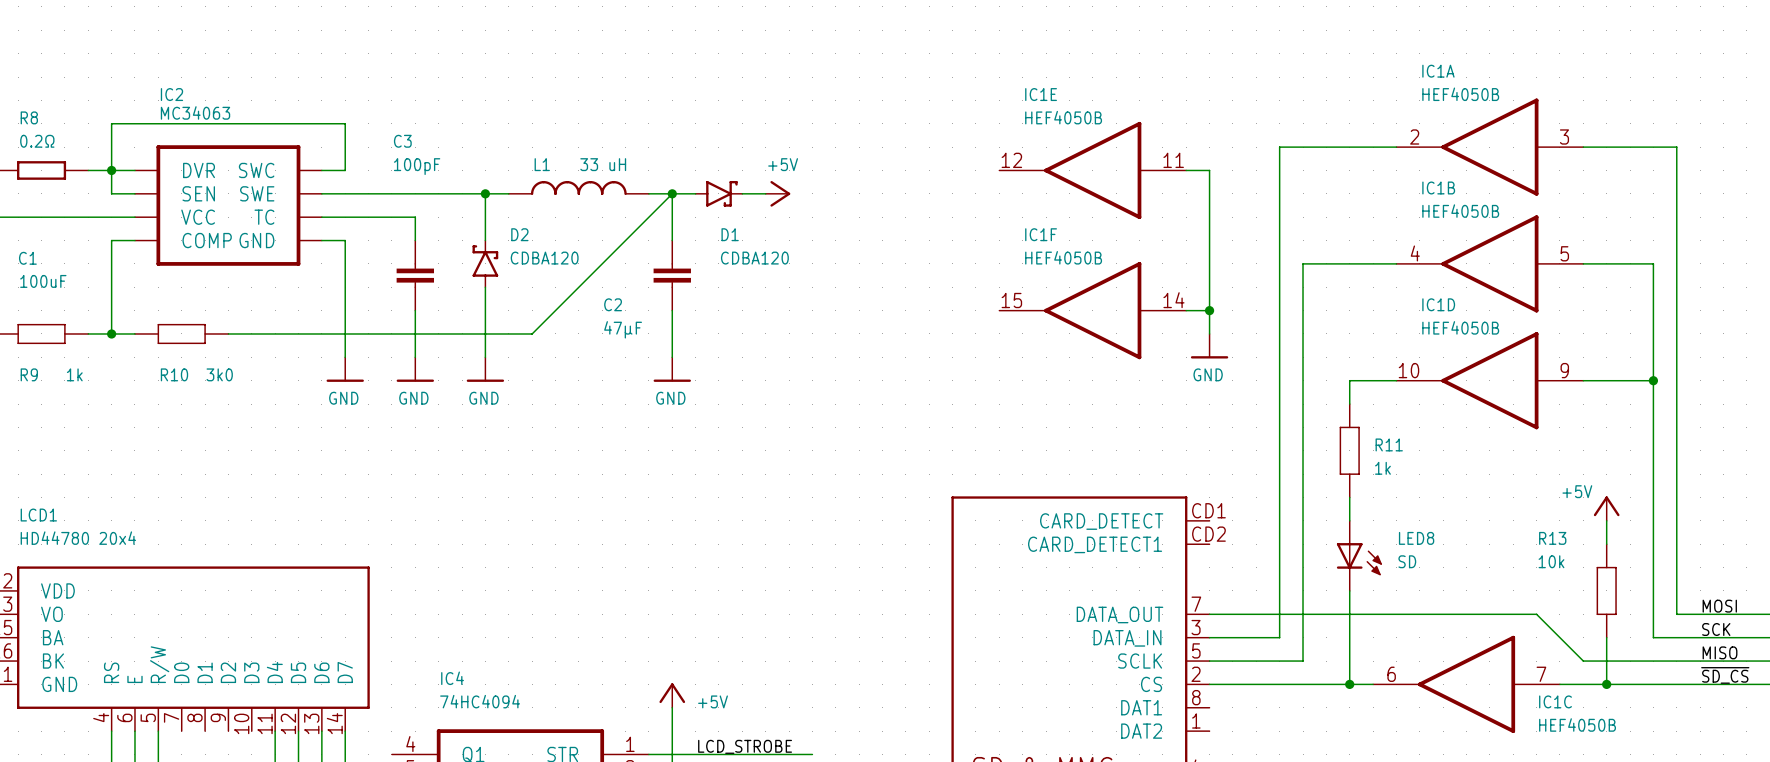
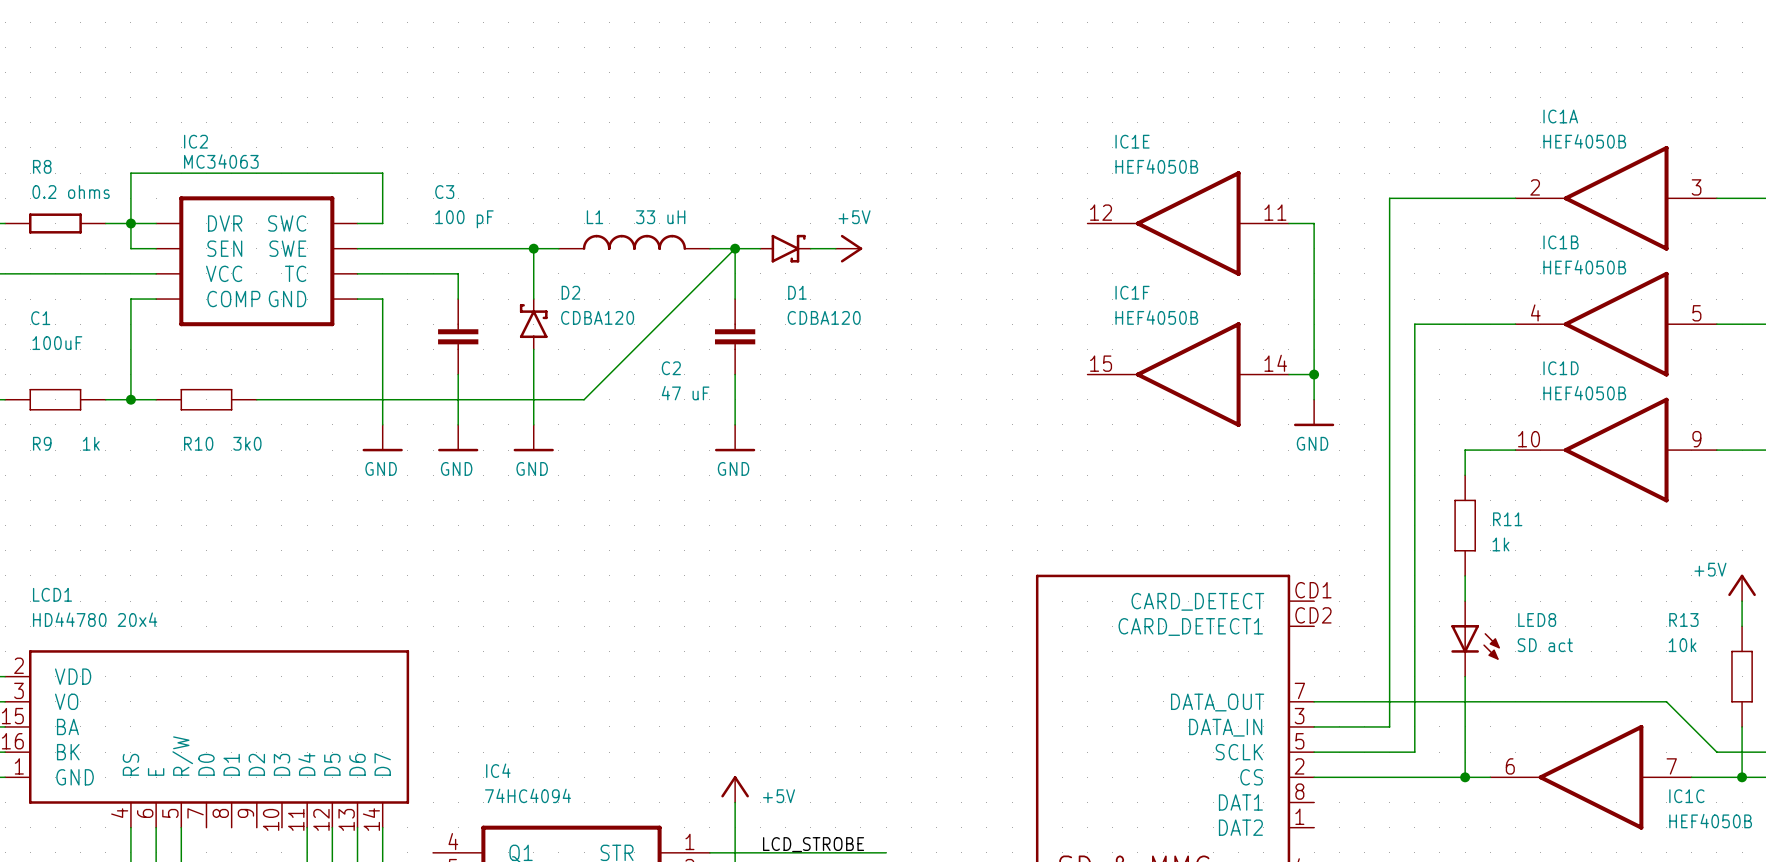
R8 value: 0.2Ω (37, 141) -> 0.2 ohms (71, 192)
C3 value: 100pF (417, 166) -> 100 pF (464, 219)
C2 value: 47µF (623, 329) -> 47 uF (685, 393)
LED8 value: SD (1407, 561) -> SD act (1545, 645)

